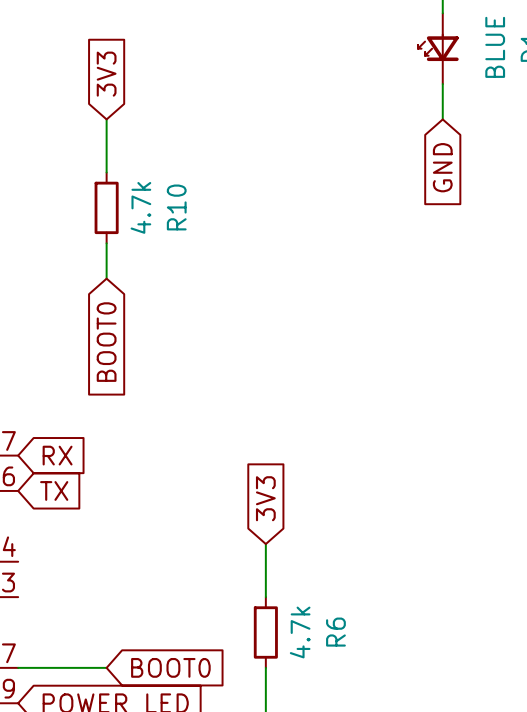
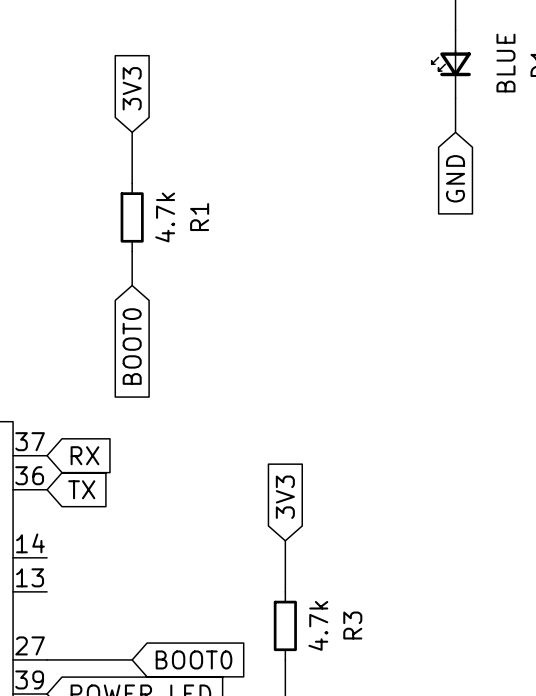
R10 name: R10 (176, 207) -> R1 (199, 217)
R6 name: R6 (335, 632) -> R3 (352, 625)

